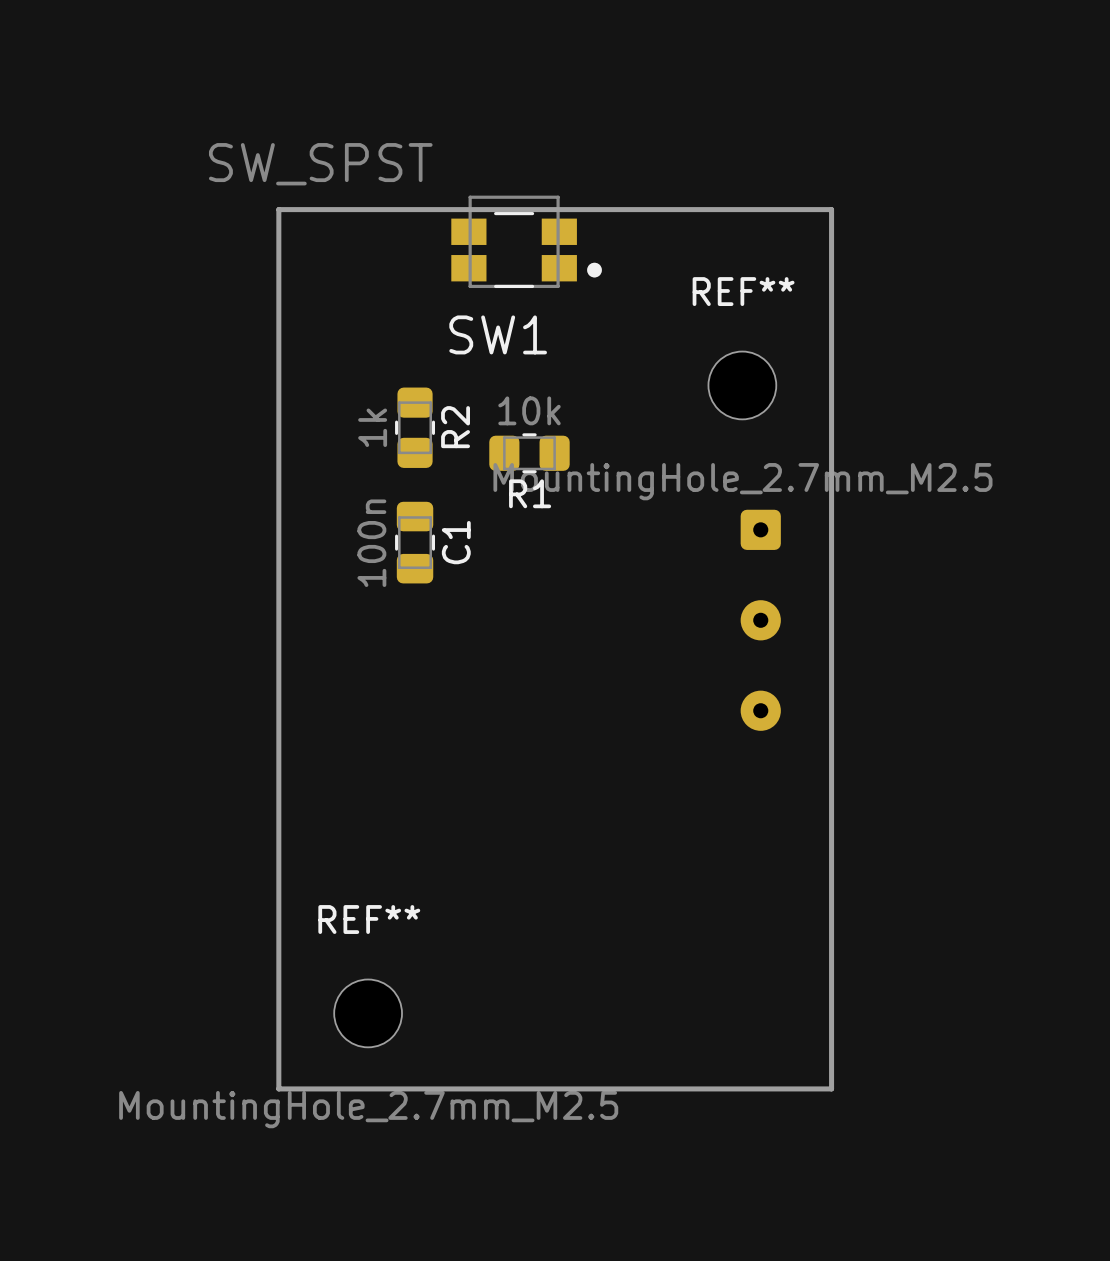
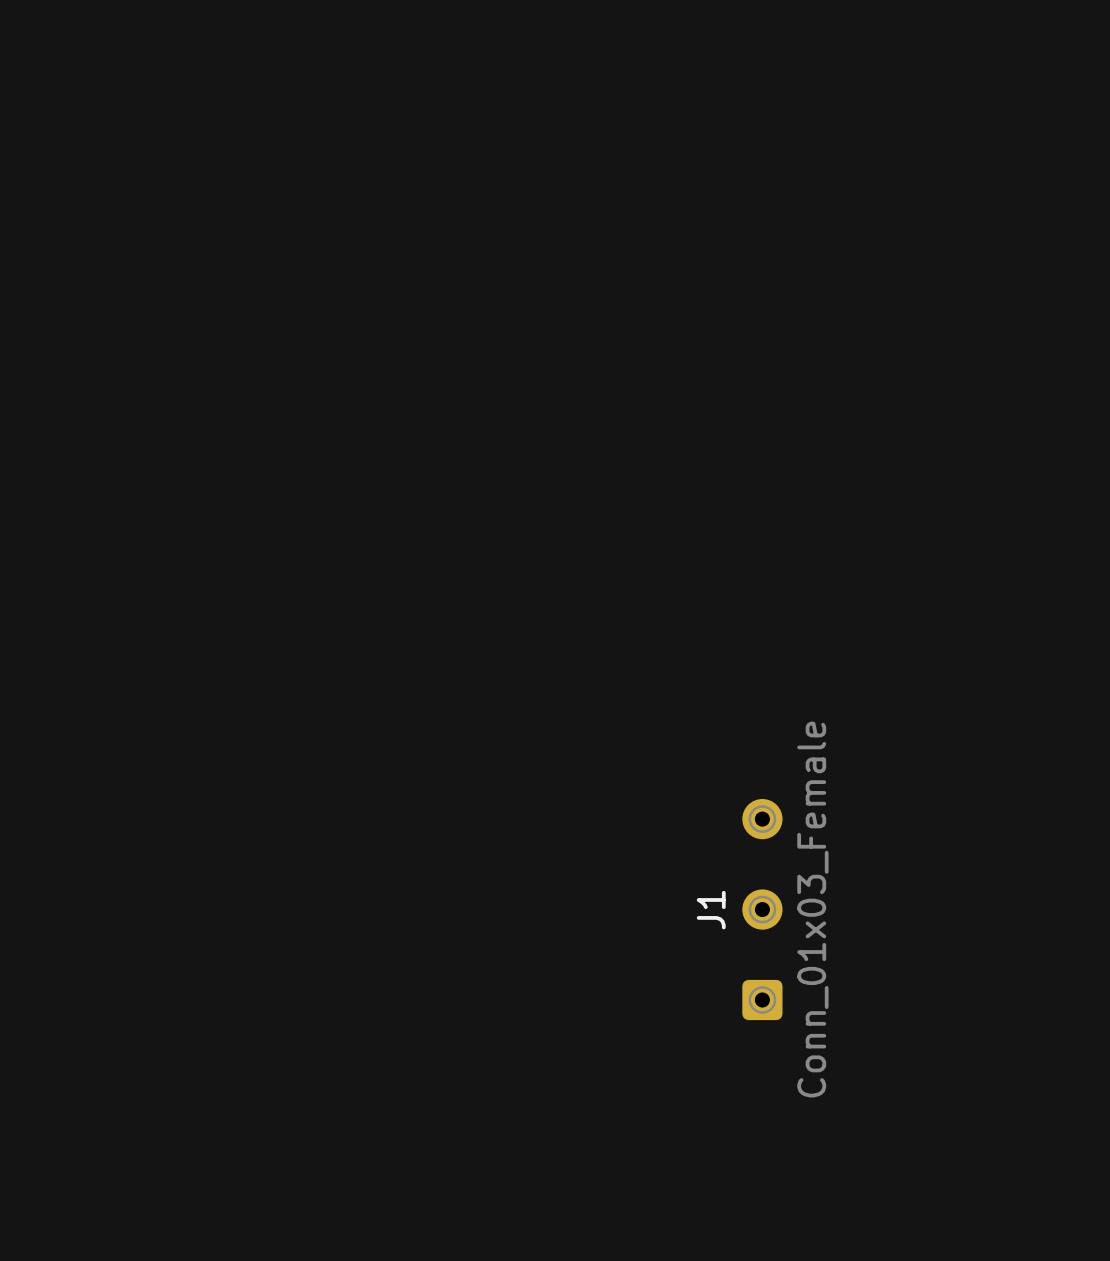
board edge: (278, 209) (831, 209) (831, 1088) (278, 1088) (278, 209) -> none
SW1: SW_SPST (526, 241) -> none
REF**: MountingHole_2.7mm_M2.5 (742, 385) -> none
R2: 1k (415, 427) -> none
R1: 10k (529, 453) -> none
C1: 100n (415, 542) -> none
J1 side: bottom (760, 620) -> top (762, 909)
REF**: MountingHole_2.7mm_M2.5 (368, 1013) -> none

